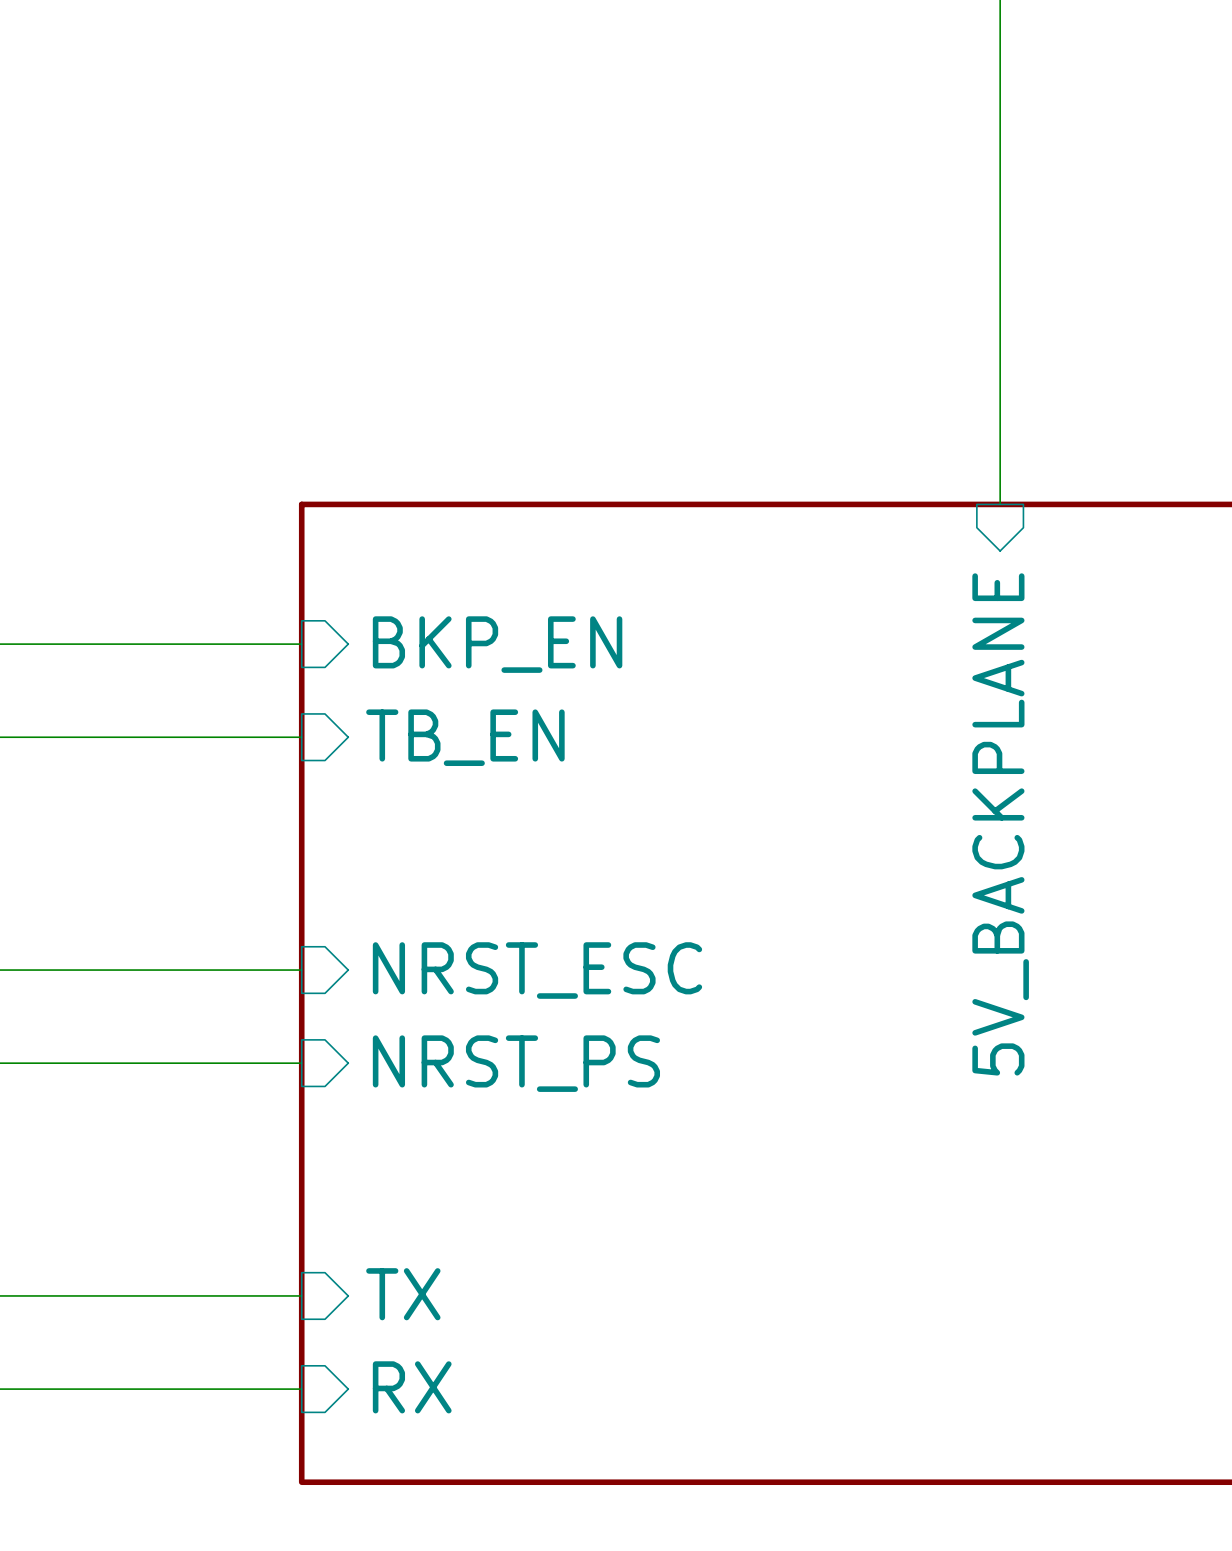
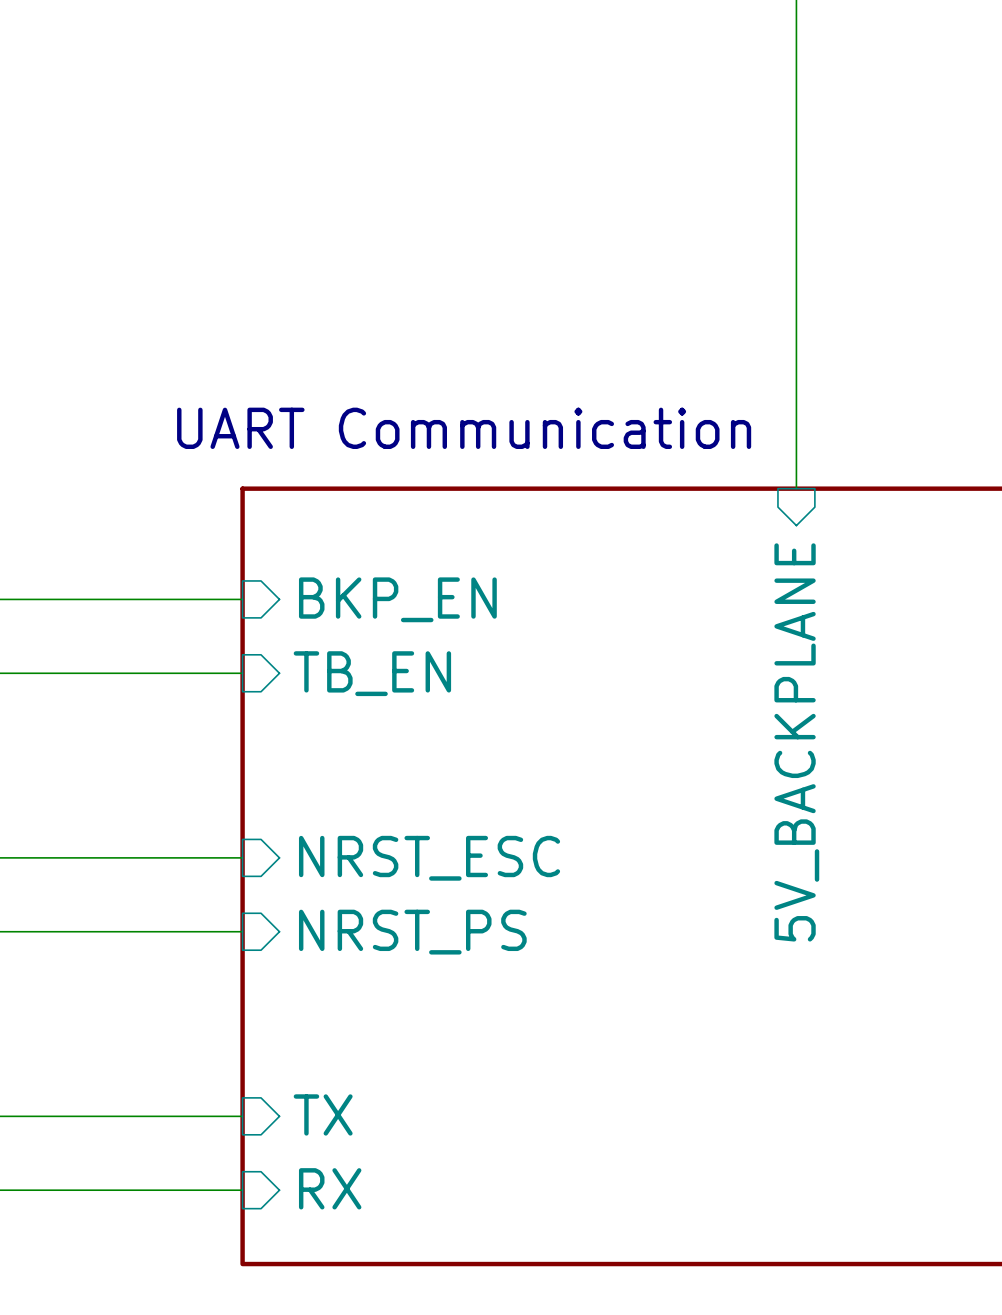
text: none -> UART Communication (464, 428)

